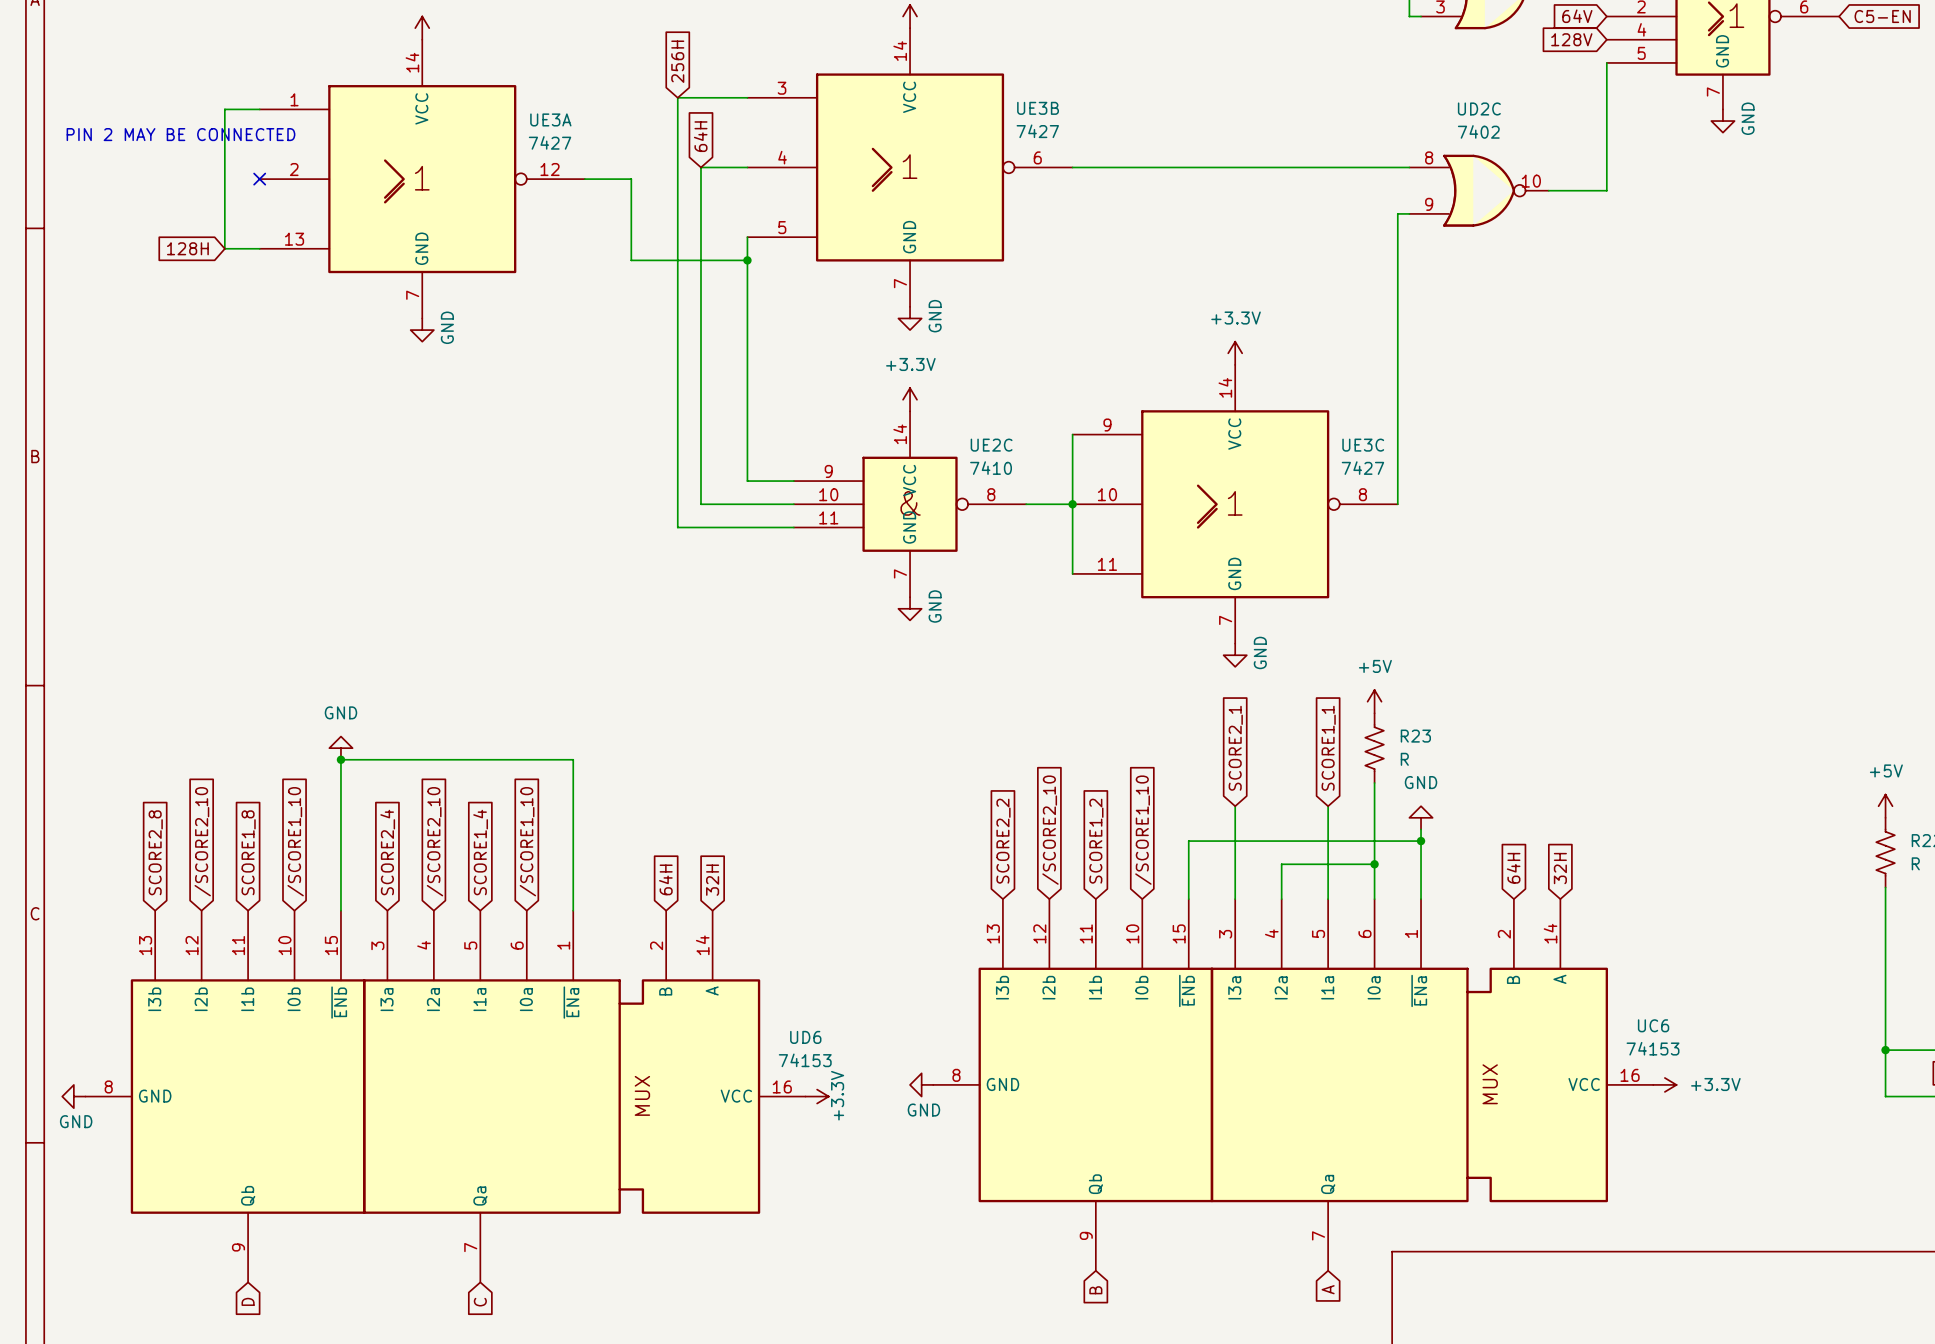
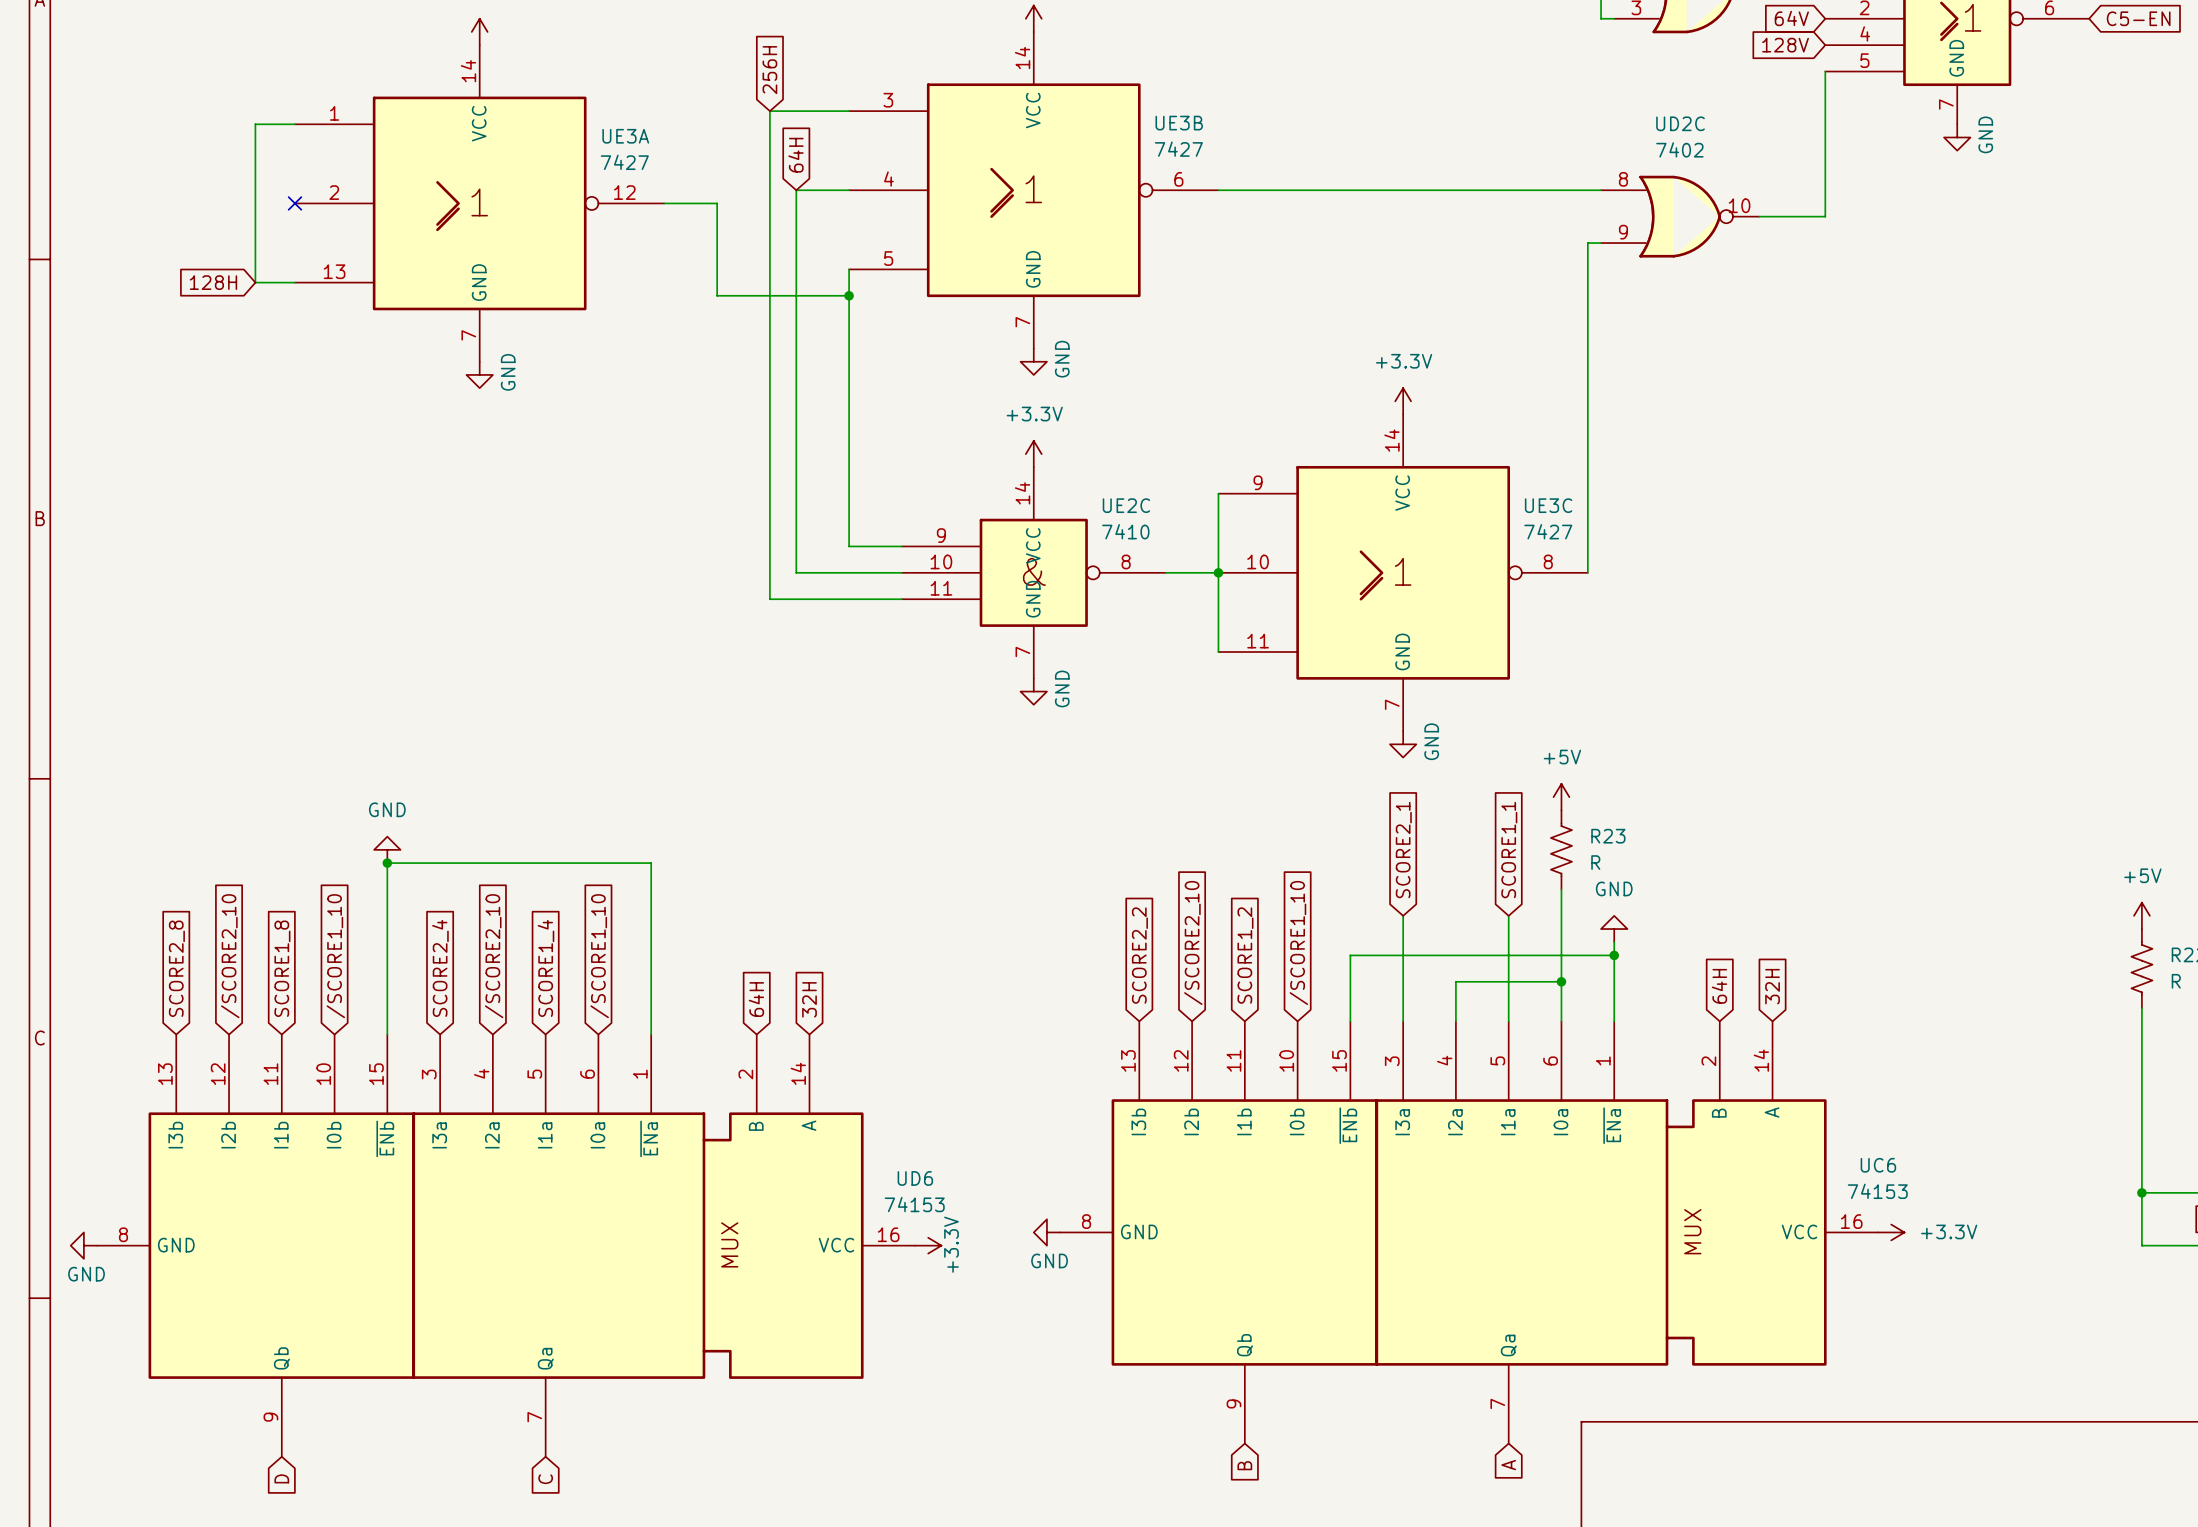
text: PIN 2 MAY BE CONNECTED (180, 134) -> none

